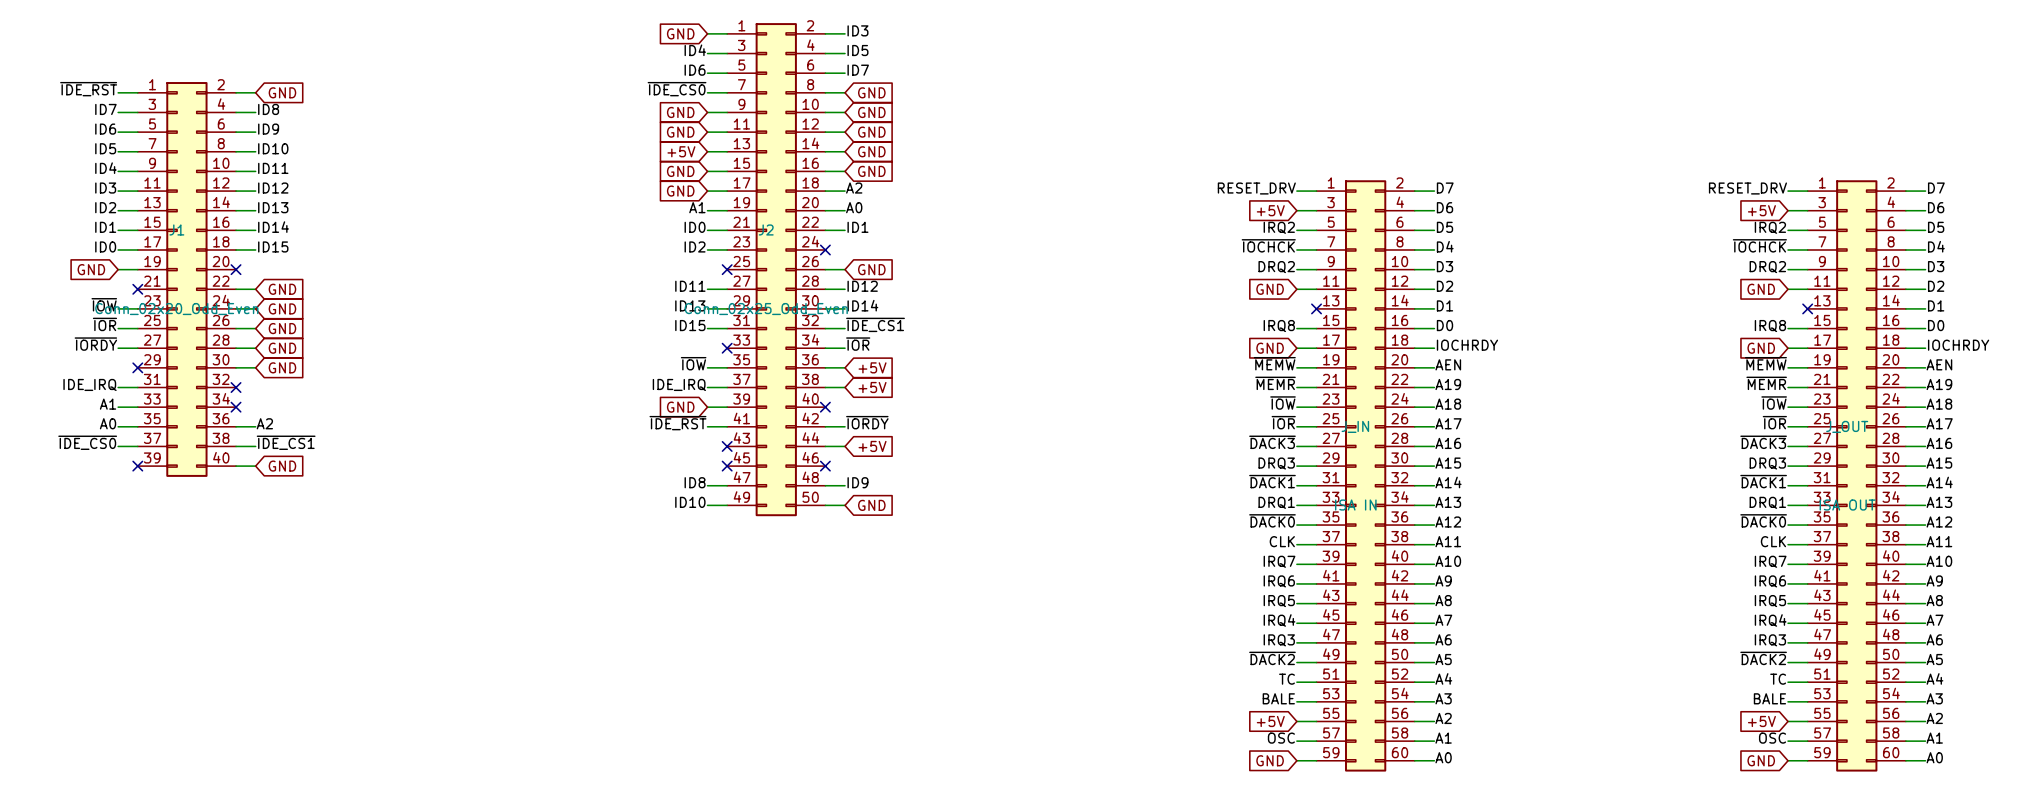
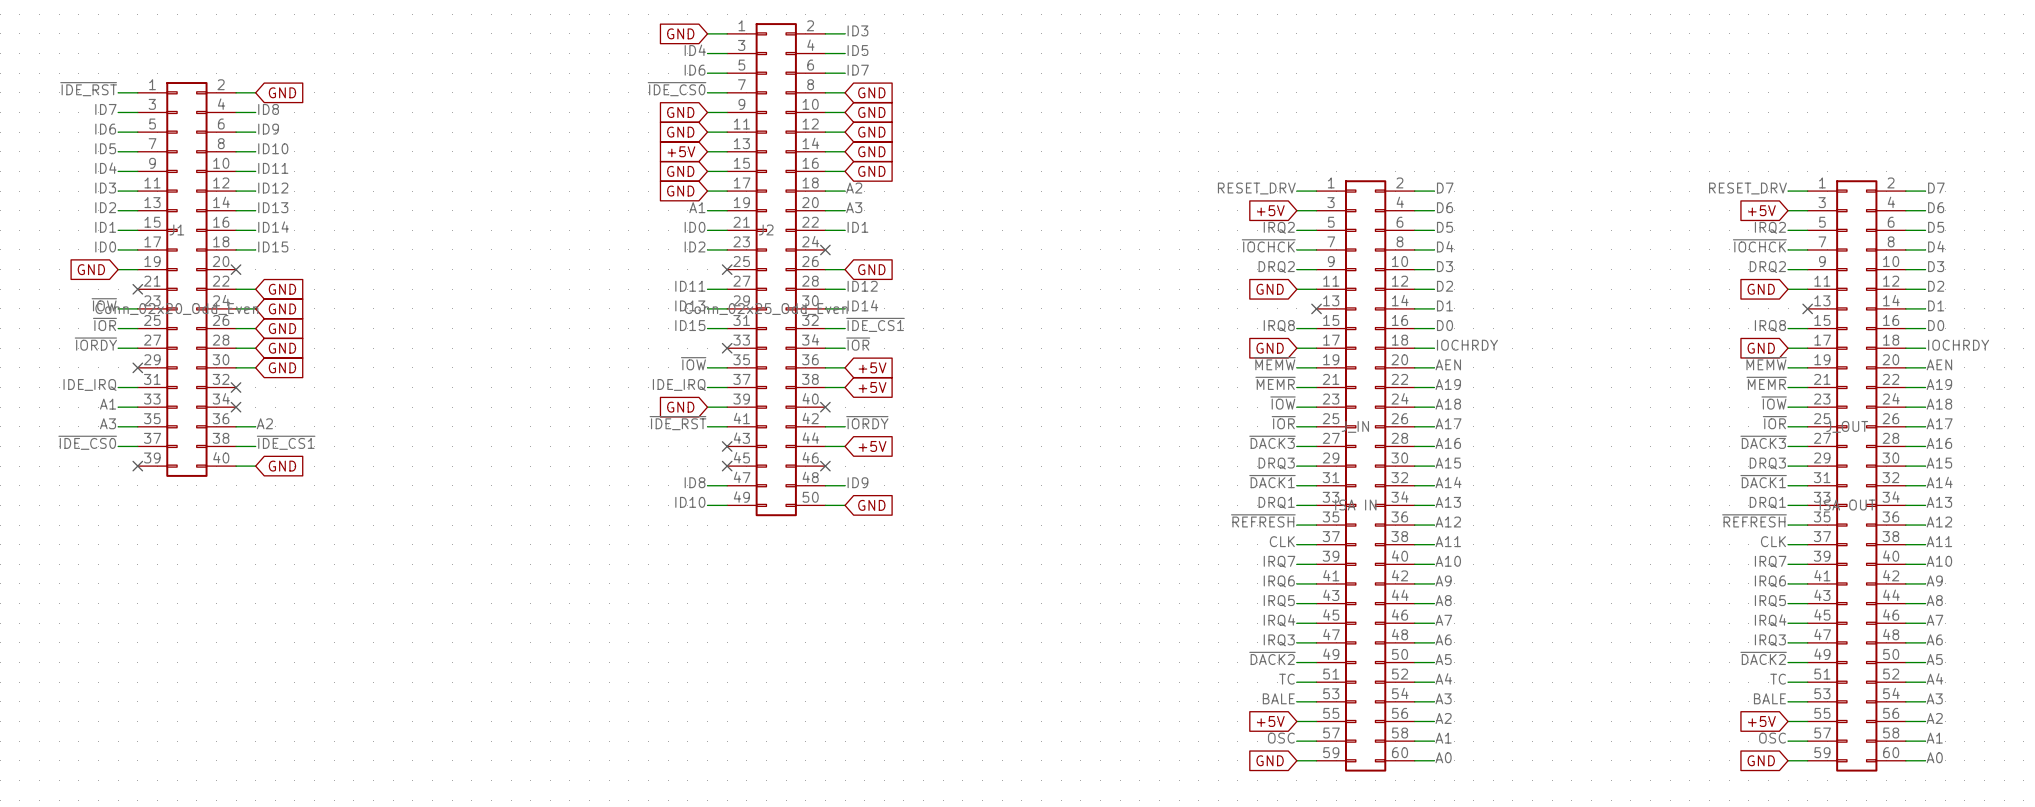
label: A0 (854, 207) -> A3 (854, 207)
label: A0 (108, 423) -> A3 (108, 423)
label: ~{DACK0} (1272, 520) -> ~{REFRESH} (1263, 520)
label: ~{DACK0} (1763, 520) -> ~{REFRESH} (1754, 520)

